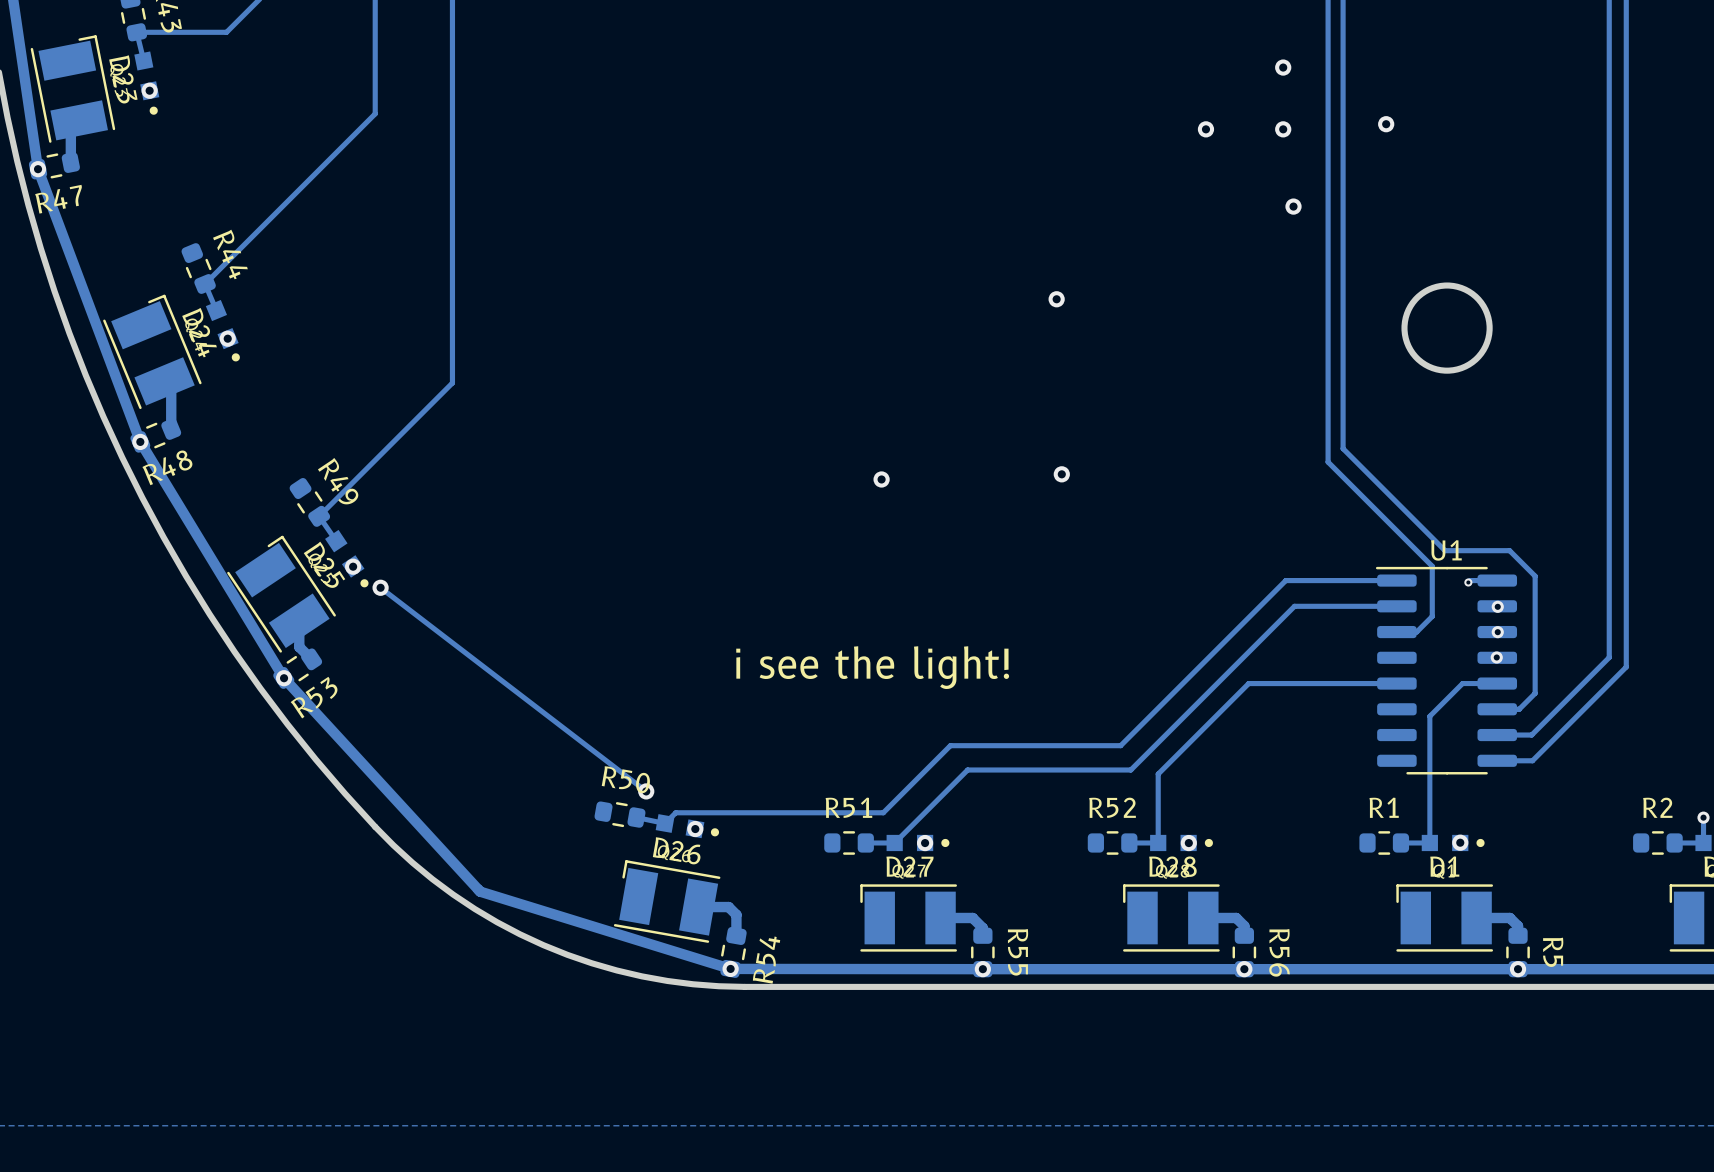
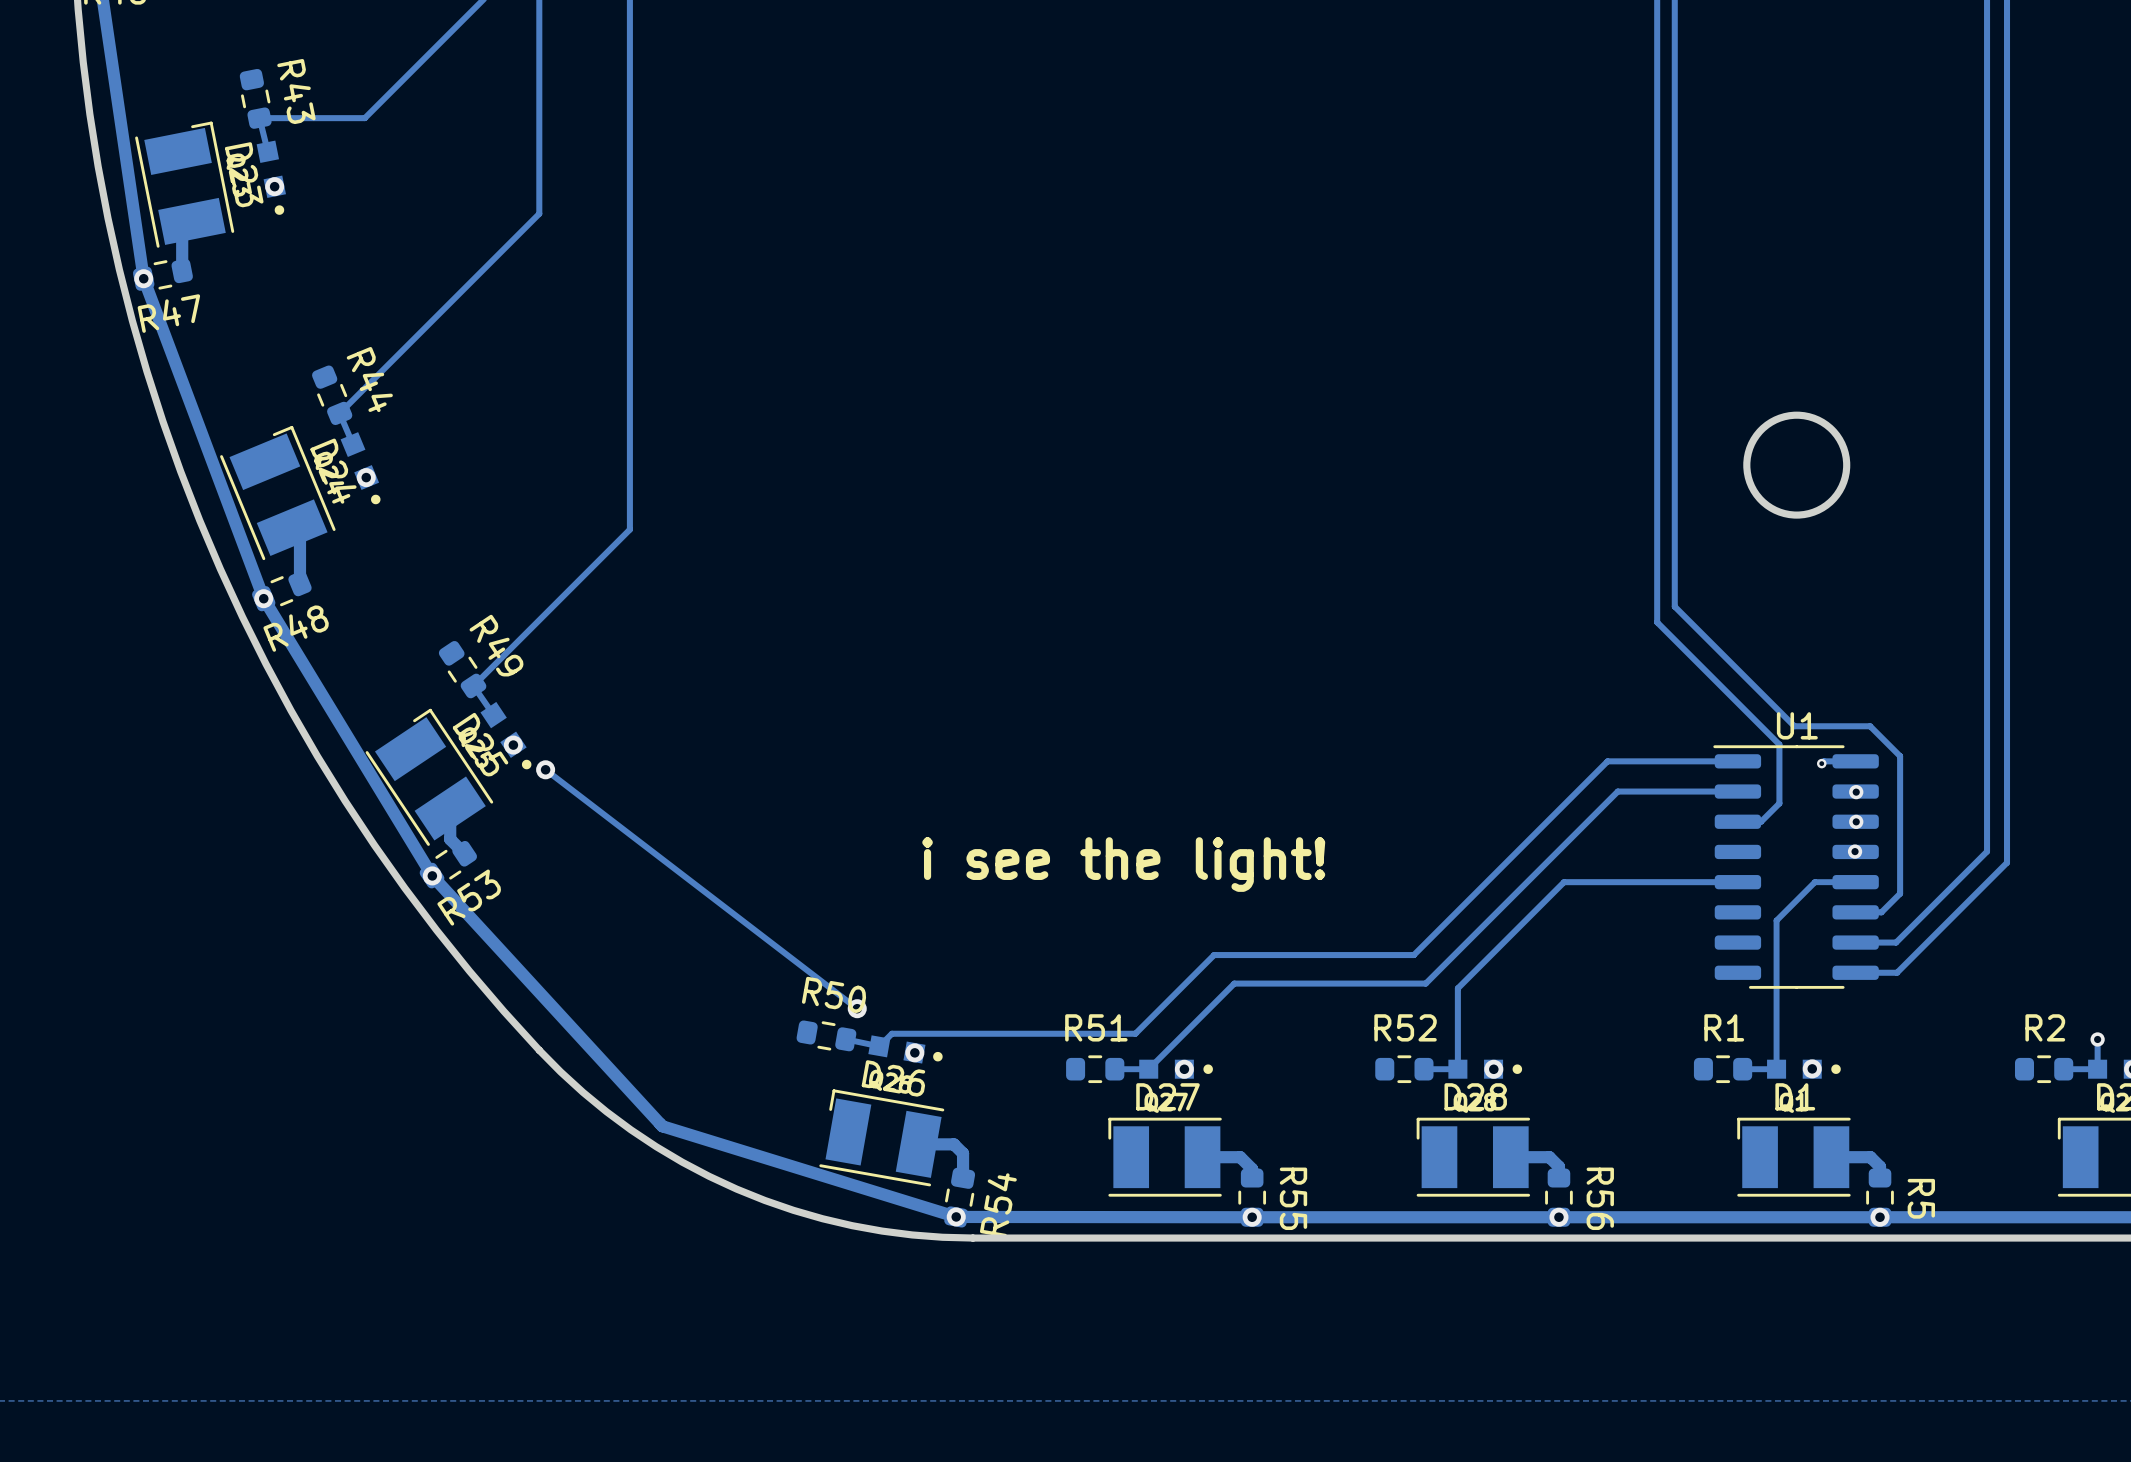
via: (1283, 67) -> none
via: (1386, 124) -> none
via: (1205, 129) -> none
via: (1283, 129) -> none
via: (1293, 206) -> none
via: (1056, 299) -> none
via: (1061, 474) -> none
via: (881, 479) -> none

